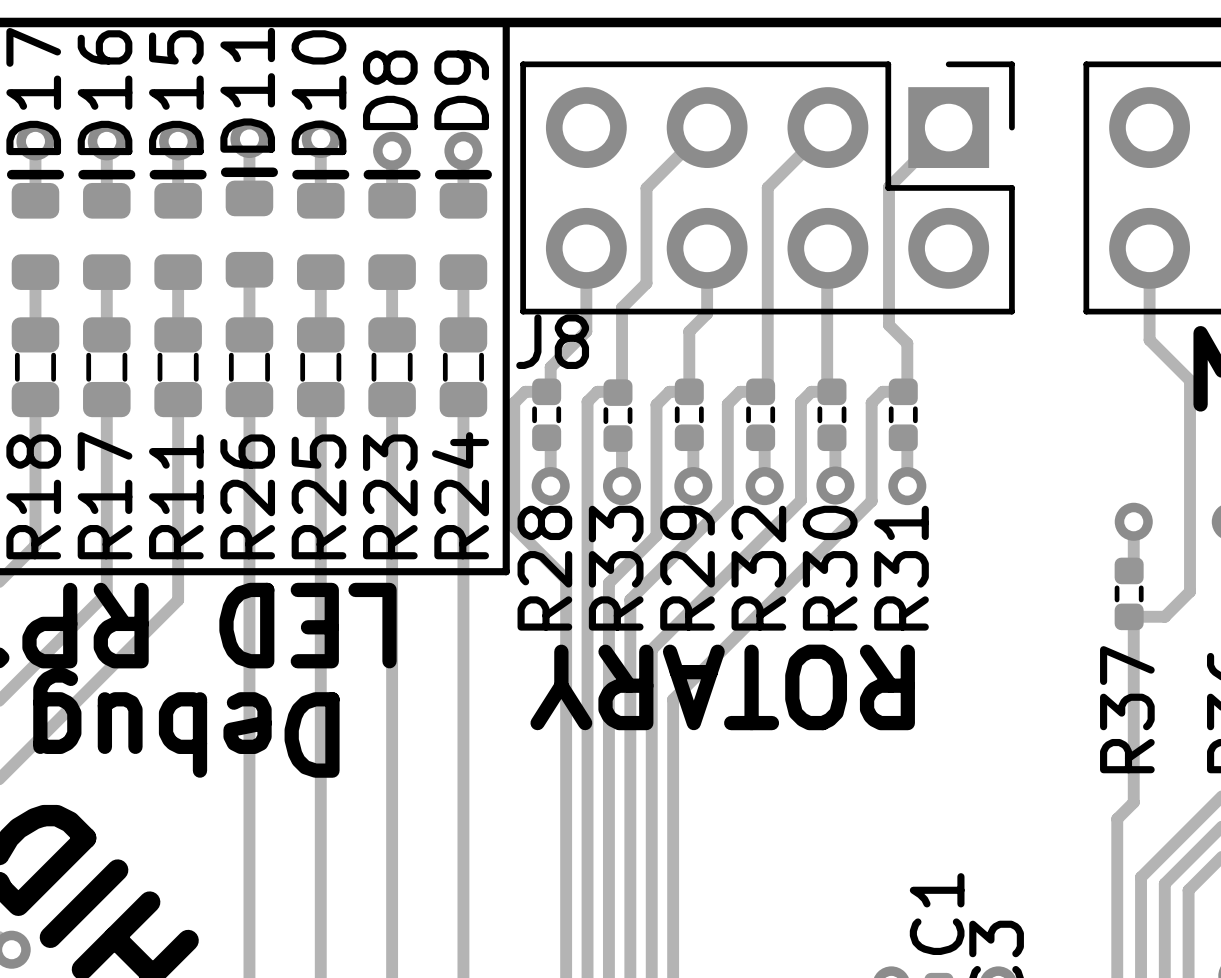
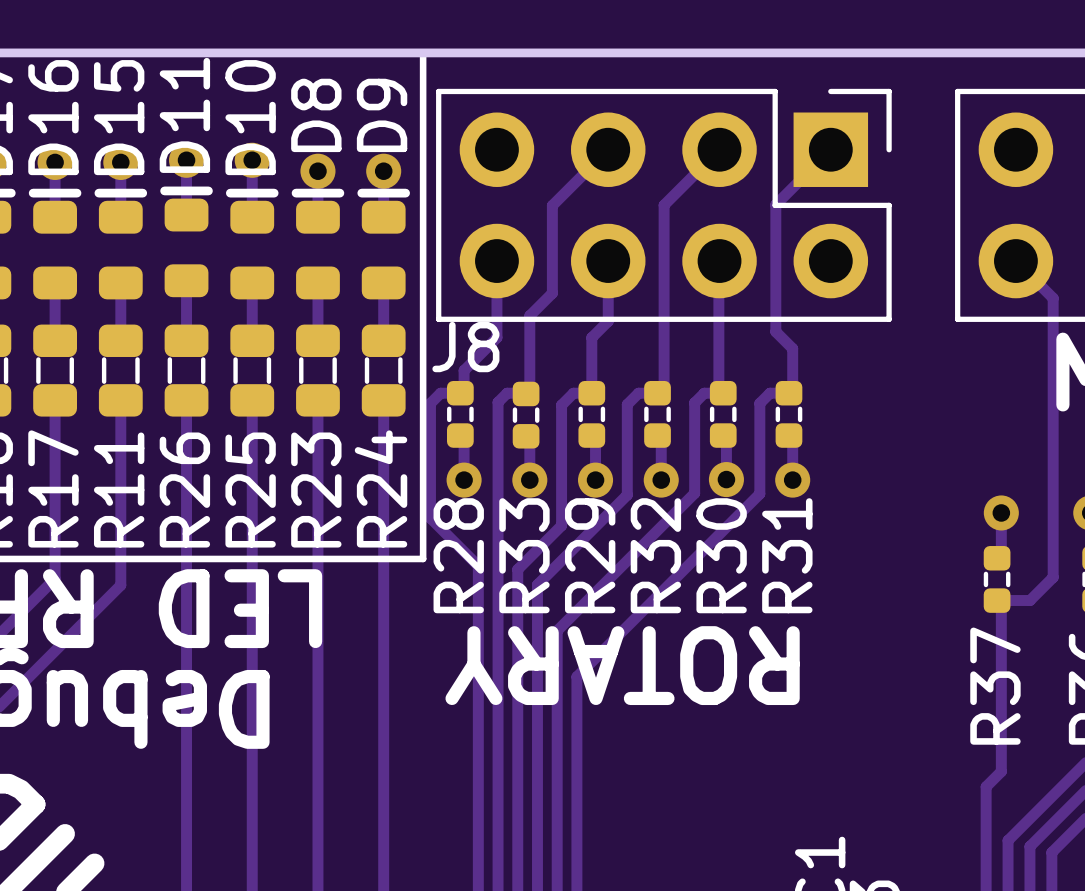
track: (1149, 248) (1149, 340) (1190, 380) -> (1015, 261) (1053, 298) (1053, 382)

